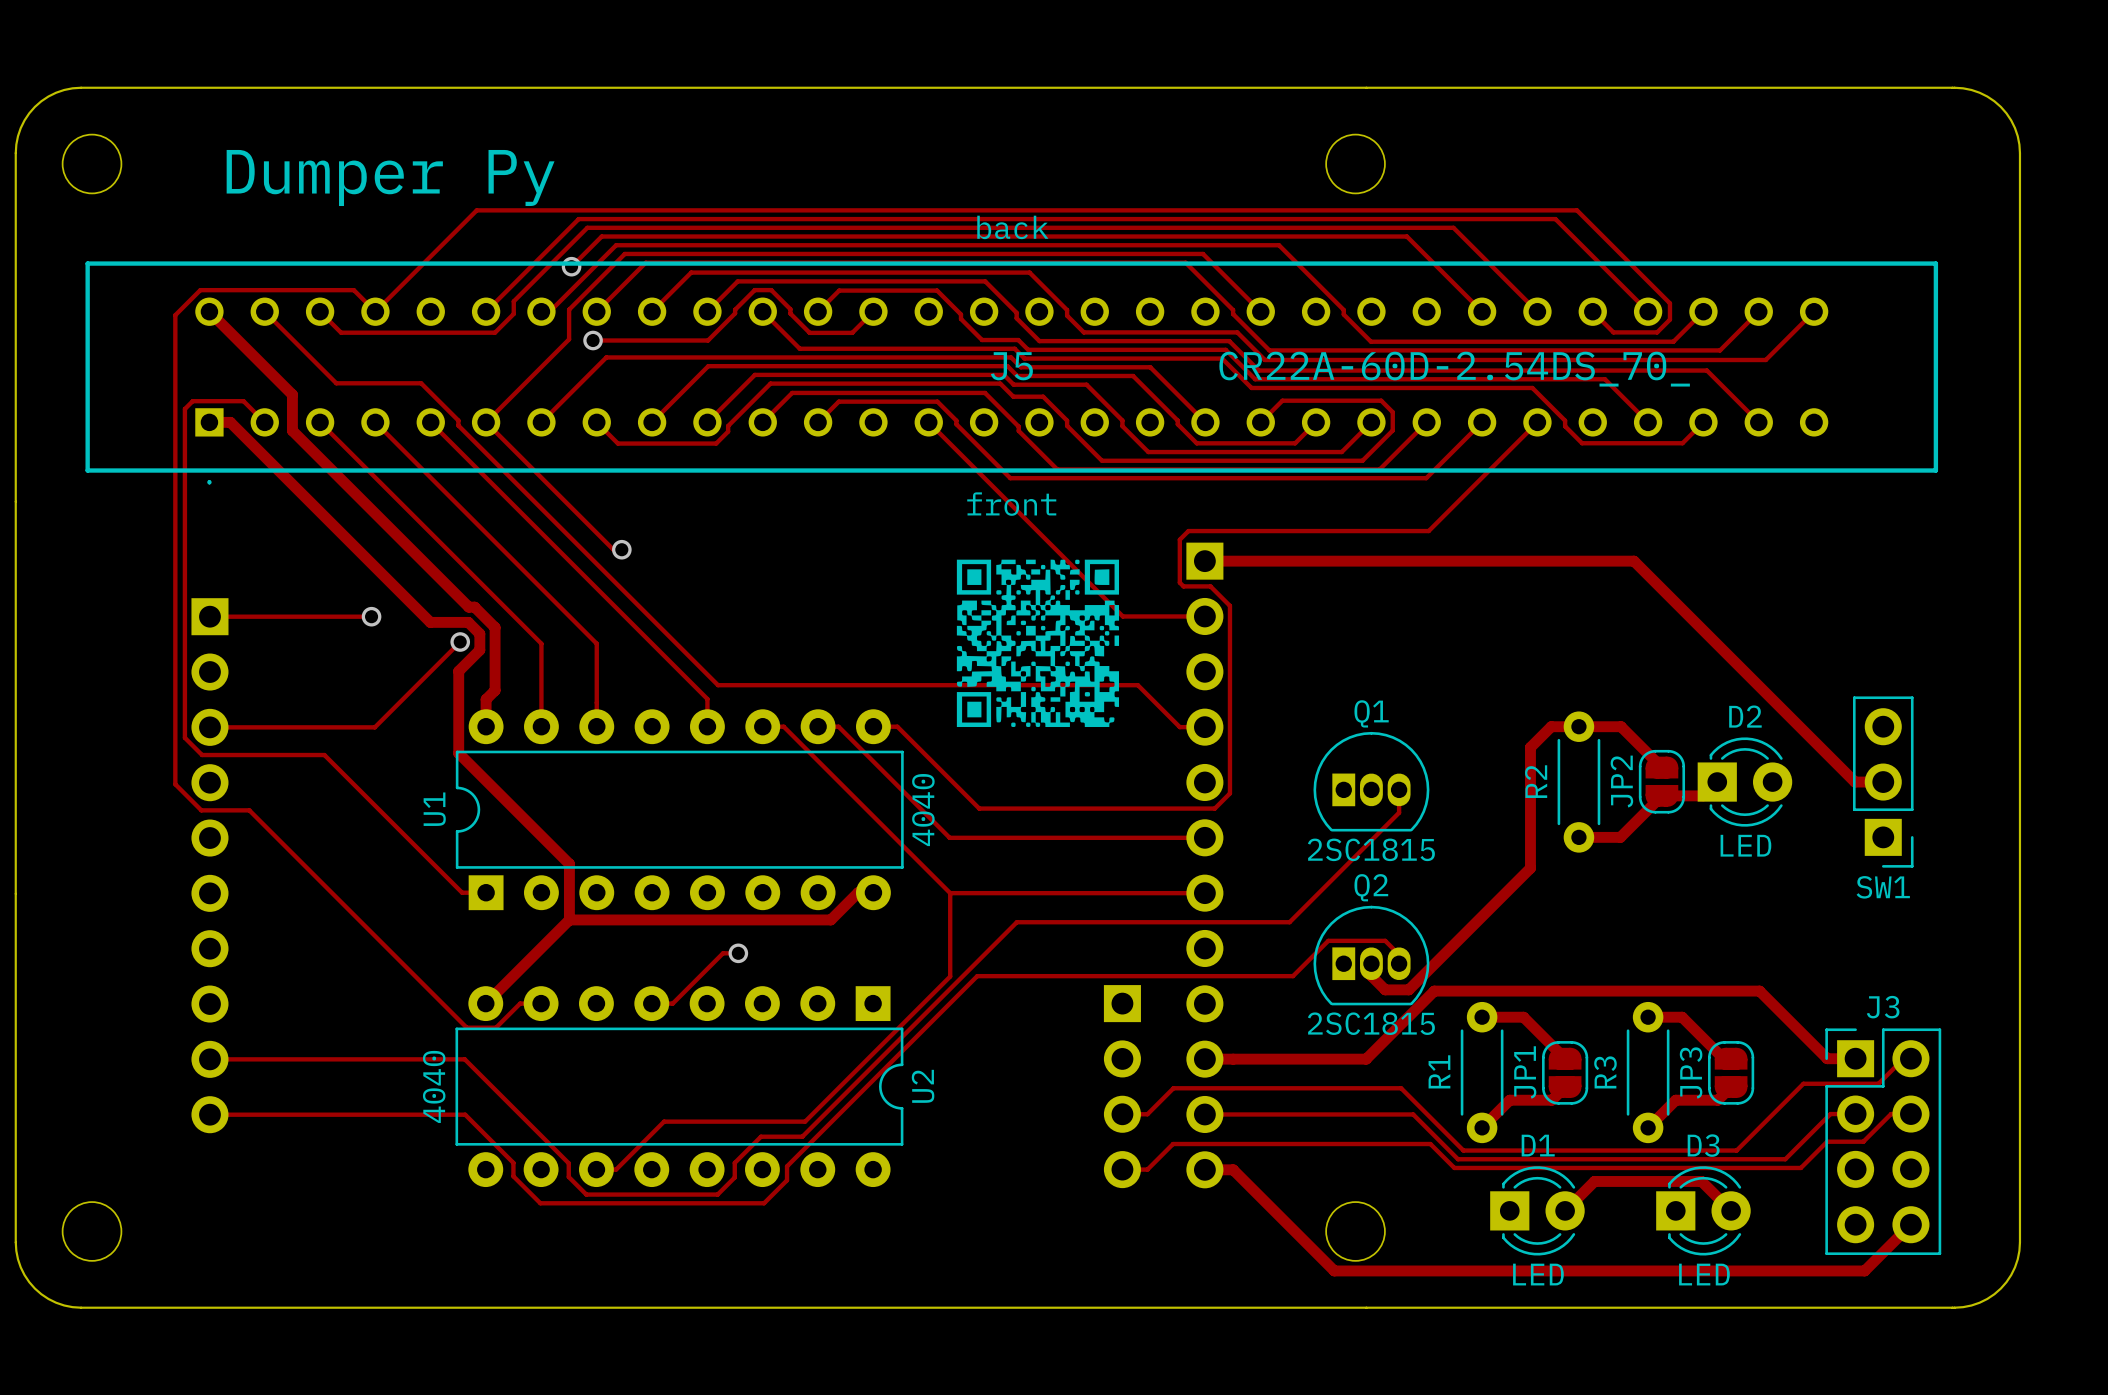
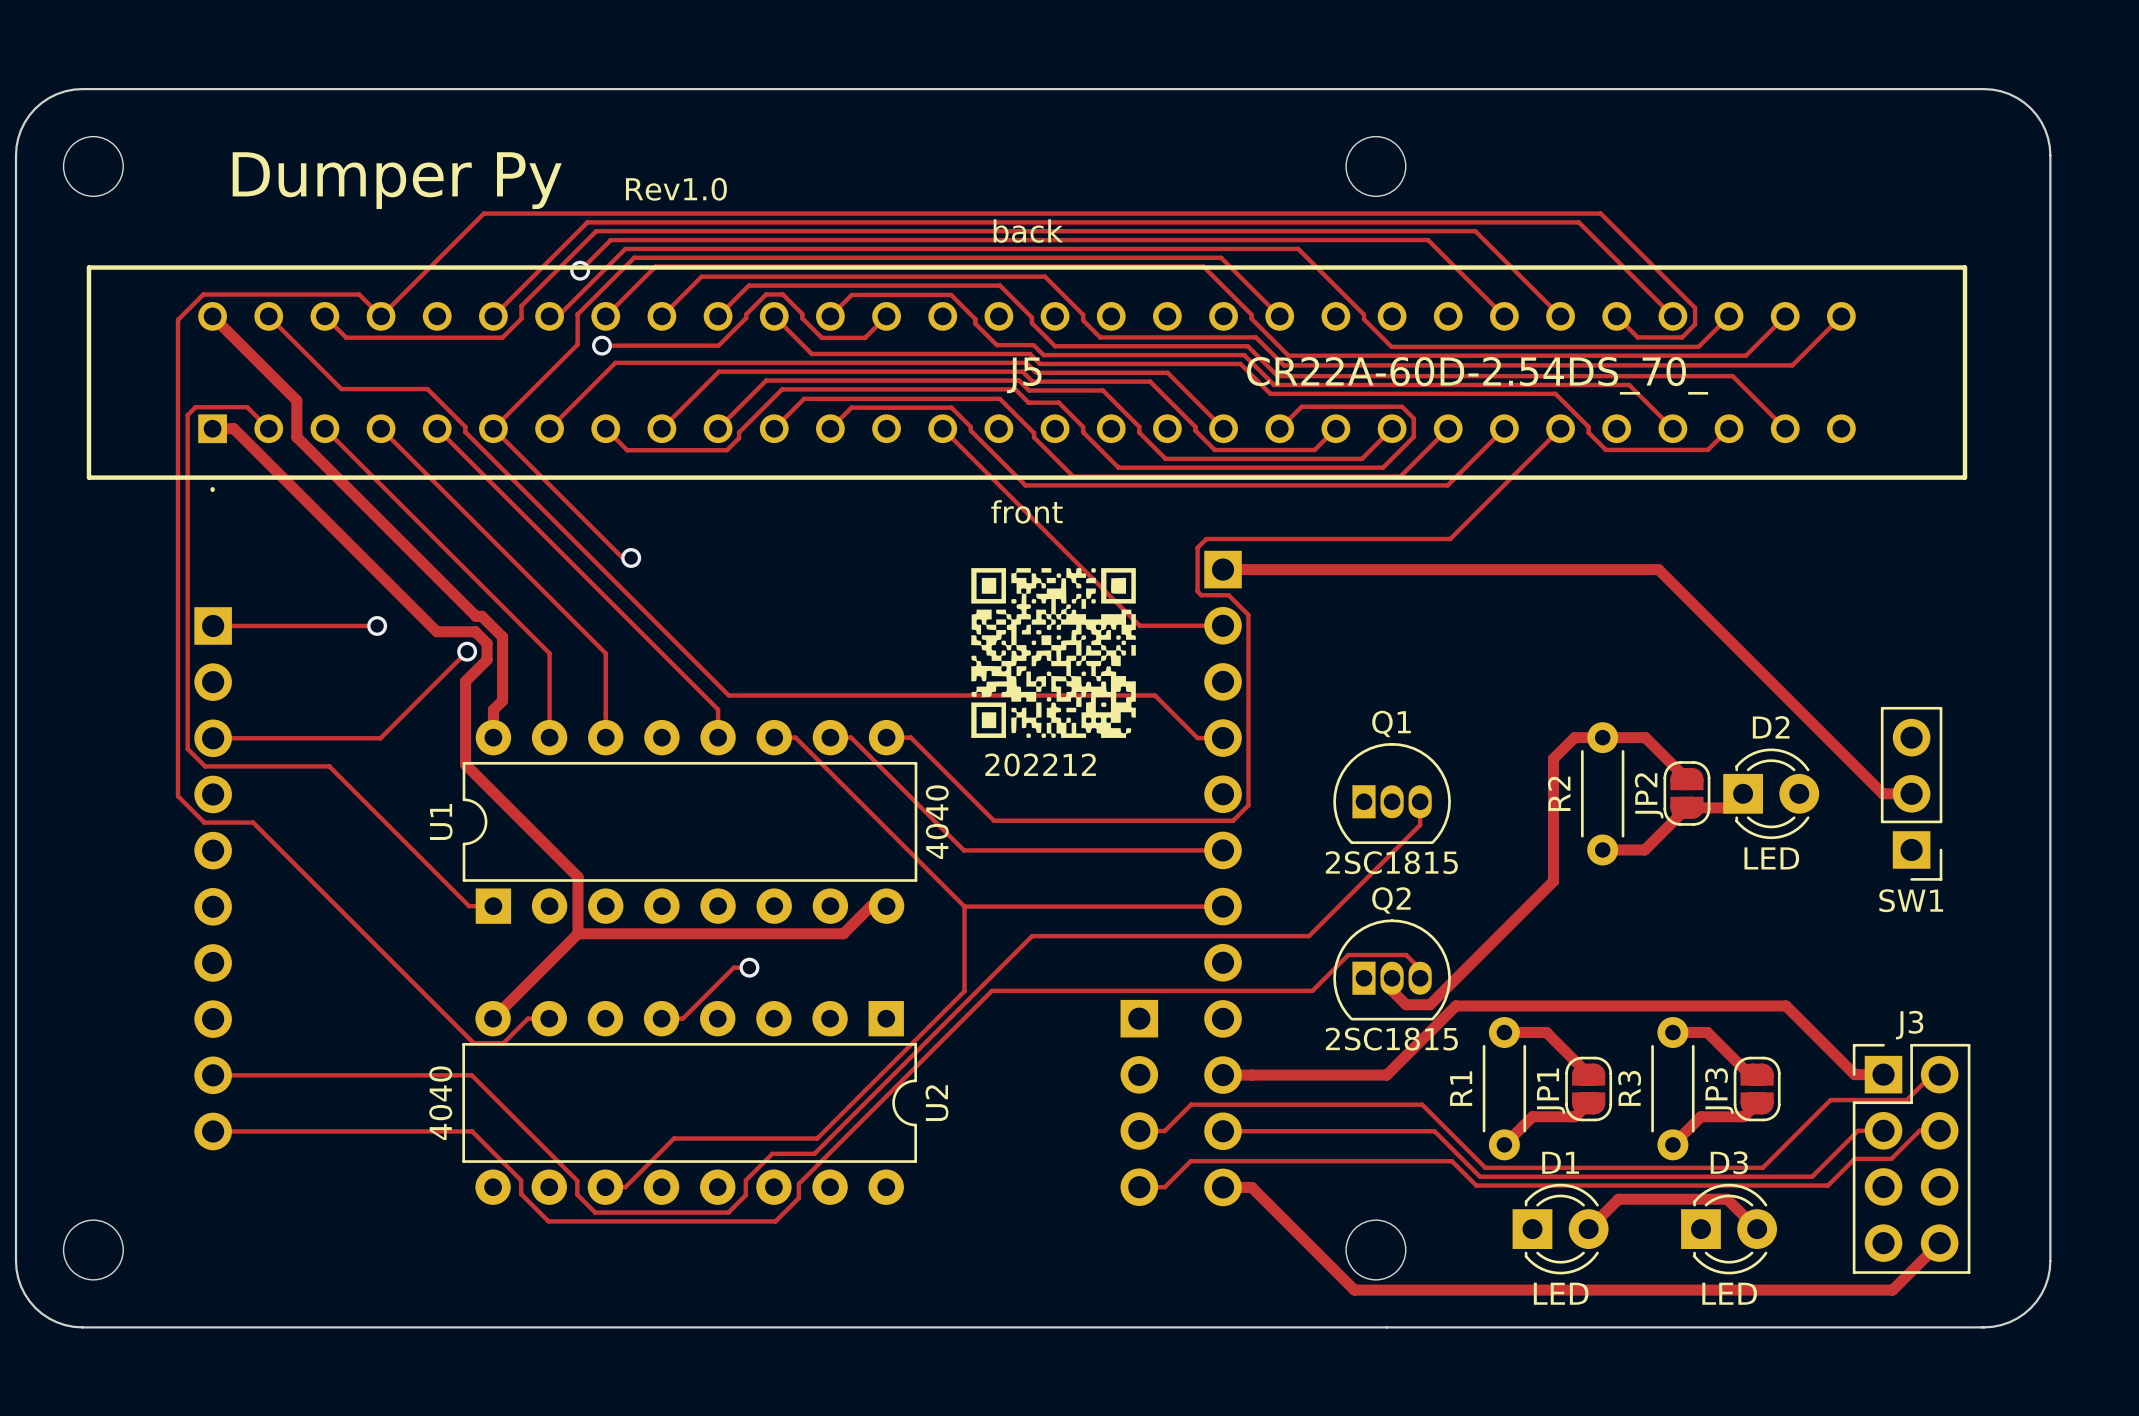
text: none -> Rev1.0 (676, 189)
text: none -> 202212 (1040, 764)

